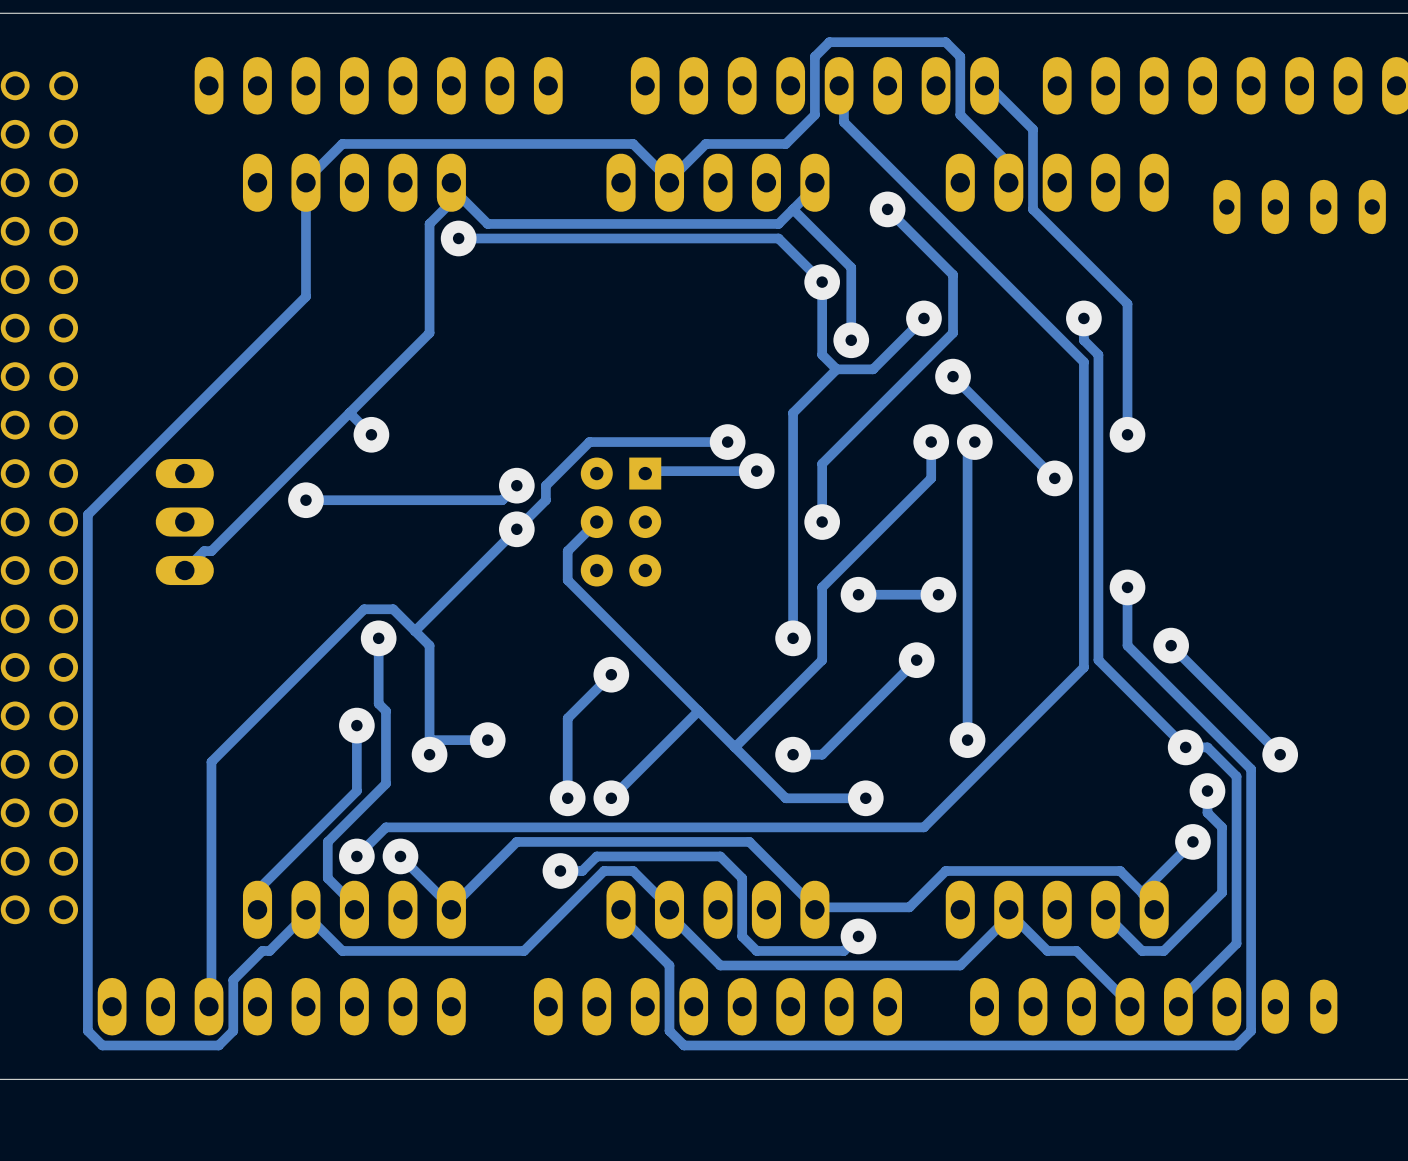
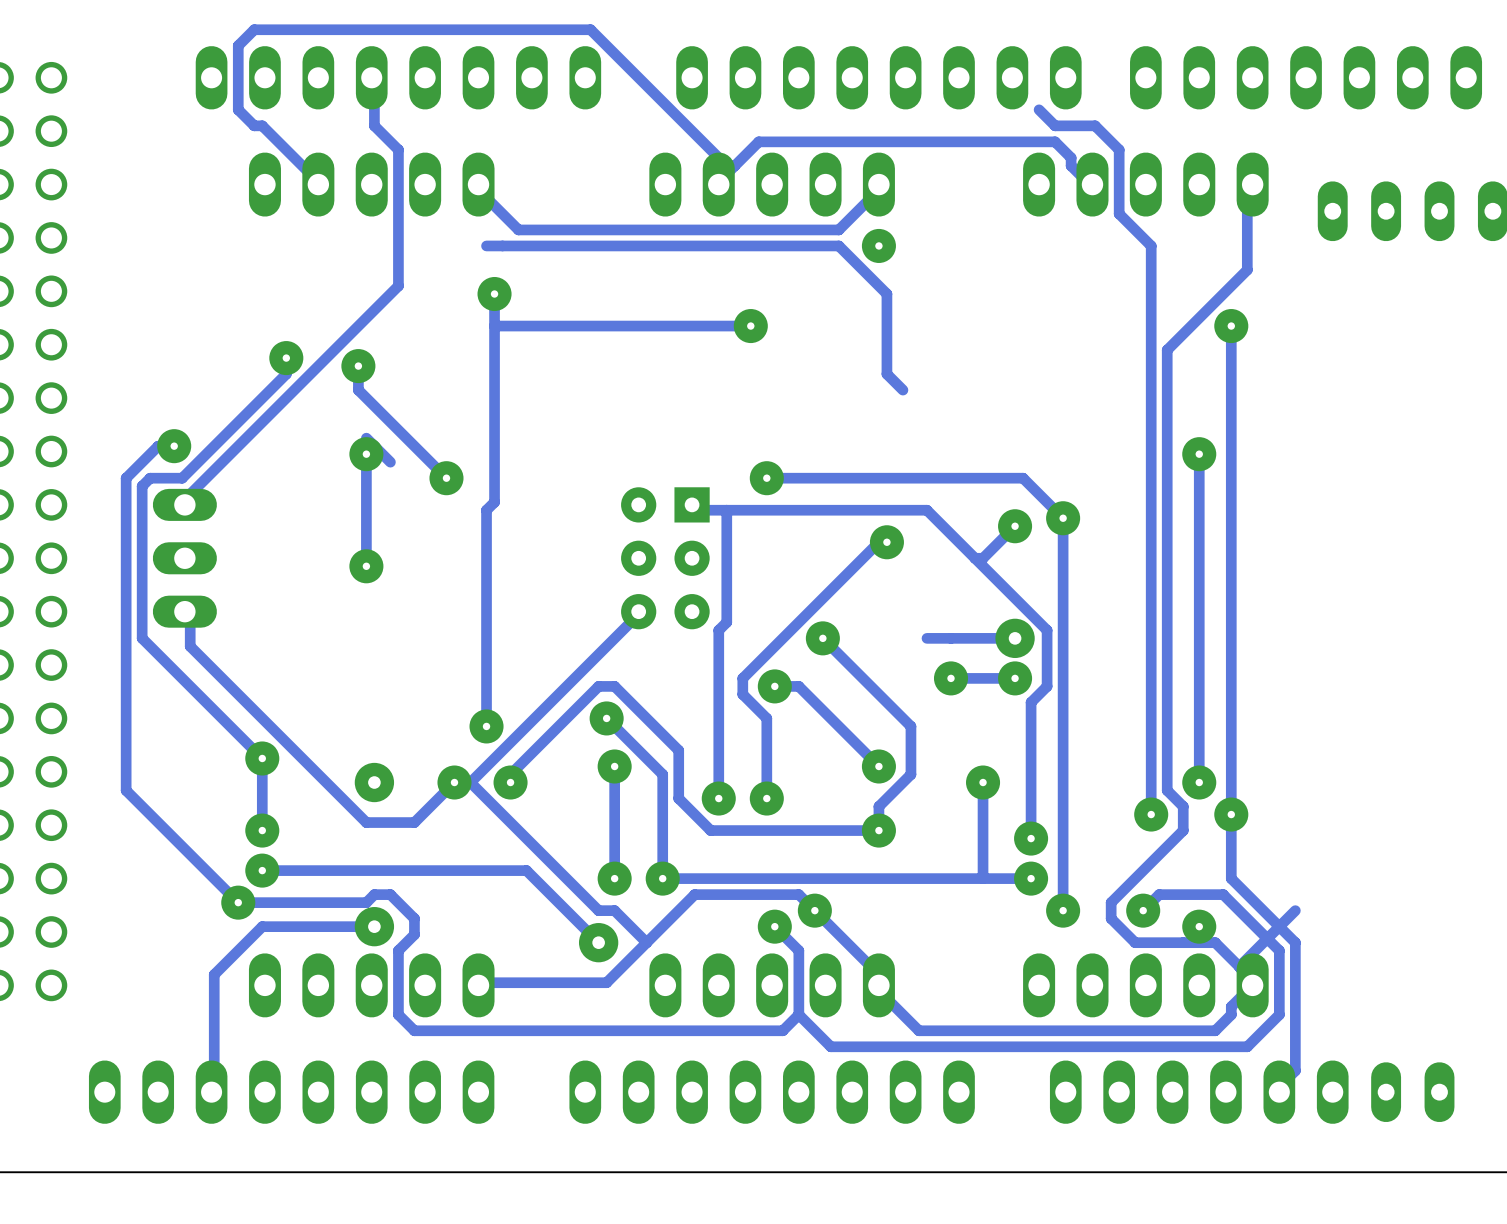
track: none -> (371, 77) (374, 77) (374, 125) (398, 149) (398, 286) (182, 502) (184, 504)
track: (839, 85) (843, 85) (843, 122) (1083, 362) (1083, 667) (923, 827) (742, 827) -> (878, 982) (878, 974) (798, 894)
track: (984, 85) (989, 85) (1033, 129) (1033, 151) -> none
track: (960, 114) (960, 56) (945, 42) (829, 42) (814, 56) (814, 114) (785, 143) -> (1087, 181) (1071, 165) (1071, 157) (1055, 141) (846, 141)
track: (974, 129) (1003, 158) (1003, 180) -> (1055, 125) (1095, 125) (1119, 149)
track: (669, 180) (633, 143) (342, 143) (305, 180) -> (734, 165) (726, 165) (590, 29) (254, 29) (238, 45) (238, 109) (254, 125) (262, 125) (318, 181)
track: (305, 182) (305, 296) (153, 449) -> (286, 358) (286, 374) (182, 478) (150, 478)
track: (451, 182) (458, 194) (429, 223) (429, 333) (211, 551) (204, 551) (184, 570) -> (470, 782) (454, 782) (414, 822) (366, 822) (190, 646) (190, 614) (184, 611)
track: (793, 209) (851, 267) (851, 340) -> none
track: (887, 209) (953, 274) (953, 333) (822, 463) (822, 522) -> none
via: (887, 209) -> none
via: (458, 238) -> none
via: none -> (878, 245)
track: (1062, 238) (1127, 303) (1127, 434) -> (1151, 245) (1151, 814)
track: none -> (494, 294) (494, 502) (486, 510) (486, 726)
via: none -> (494, 294)
via: (822, 282) -> none
track: none -> (750, 326) (494, 326)
via: none -> (750, 326)
via: none -> (1231, 326)
track: (923, 318) (873, 369) (836, 369) (793, 412) (793, 638) -> none
via: (923, 318) -> none
track: (1083, 318) (1083, 340) (1098, 354) (1098, 660) (1185, 747) (1207, 747) (1236, 776) (1236, 943) (1192, 987) -> (1231, 326) (1231, 878) (1295, 942) (1295, 1070)
via: (1083, 318) -> none
via: none -> (286, 358)
via: (851, 340) -> none
track: none -> (358, 366) (358, 390) (446, 478)
via: none -> (358, 366)
track: (953, 376) (1054, 478) -> none
via: (953, 376) -> none
via: none -> (174, 446)
track: none -> (366, 454) (366, 566)
via: none -> (366, 454)
track: none -> (1199, 454) (1199, 782)
via: none -> (1199, 454)
via: (371, 434) -> none
via: (1127, 434) -> none
track: (727, 442) (589, 442) (545, 485) (545, 500) (415, 631) -> none
via position: (727, 442) -> (766, 478)
track: (931, 442) (931, 478) (822, 587) (822, 660) (734, 747) -> none
via: (931, 442) -> none
track: (974, 442) (967, 449) (967, 587) -> none
via: (974, 442) -> none
via: none -> (446, 478)
track: none -> (766, 478) (1023, 478) (1063, 518) (1063, 910)
track: (146, 456) (87, 514) (87, 1030) (102, 1045) (218, 1045) (233, 1030) (233, 980) (262, 950) (269, 950) (305, 914) -> (142, 486) (142, 638) (262, 758) (262, 830)
track: (756, 471) (647, 471) (645, 473) -> (1047, 630) (926, 510) (694, 510) (692, 504)
via: (756, 471) -> none
track: none -> (726, 510) (726, 622) (718, 630) (718, 798)
via: (1054, 478) -> none
track: (516, 485) (502, 500) (305, 500) -> none
via: (516, 485) -> none
via: none -> (1063, 518)
track: none -> (1015, 526) (983, 558) (975, 558)
via: none -> (1015, 526)
via: (305, 500) -> none
track: none -> (886, 542) (878, 542) (742, 678) (742, 694) (766, 718) (766, 798)
track: (596, 522) (567, 551) (567, 580) (785, 798) (865, 798) -> none
via position: (822, 522) -> (886, 542)
via: none -> (366, 566)
via: (516, 529) -> none
track: none -> (638, 611) (638, 614) (470, 782)
track: (1127, 587) (1127, 645) (1251, 769) (1251, 1030) (1236, 1045) (684, 1045) (669, 1030) (669, 965) (618, 914) (621, 909) -> none
via: (1127, 587) -> none
track: none -> (822, 638) (910, 726) (910, 774) (878, 806) (878, 830) (710, 830) (678, 798) (678, 750) (614, 686) (598, 686) (510, 774) (510, 782)
via: none -> (822, 638)
via: (858, 594) -> none
via: none -> (951, 678)
via: none -> (1015, 678)
track: (378, 638) (378, 703) (385, 711) (385, 783) (327, 841) (327, 878) (356, 907) (354, 909) -> none
via: (378, 638) -> none
track: none -> (774, 686) (798, 686) (878, 766)
via: none -> (774, 686)
via: (793, 638) -> none
track: (967, 638) (967, 740) -> (1047, 686) (1031, 702) (1031, 838)
track: (1171, 645) (1280, 754) -> none
via: (1171, 645) -> none
track: (916, 660) (822, 754) (793, 754) -> none
via: (916, 660) -> none
track: none -> (606, 718) (662, 774) (662, 878) (1031, 878)
via: none -> (606, 718)
via: none -> (486, 726)
track: (611, 674) (567, 718) (567, 798) -> none
via: (611, 674) -> none
via: none -> (262, 758)
track: none -> (614, 766) (614, 878)
via: none -> (614, 766)
track: (698, 711) (611, 798) -> none
via: none -> (878, 766)
via: none -> (454, 782)
track: none -> (983, 782) (983, 878)
via: none -> (983, 782)
via: none -> (1199, 782)
track: (356, 732) (356, 791) (262, 885) (262, 907) (257, 909) -> none
track: (487, 740) (429, 740) -> (1015, 678) (951, 678)
via position: (487, 740) -> (510, 782)
via: none -> (718, 798)
via: none -> (766, 798)
via: (967, 740) -> none
via: (1185, 747) -> none
track: (429, 754) (429, 645) (393, 609) (364, 609) (211, 761) (211, 900) -> (382, 926) (262, 926) (214, 974)
via: (429, 754) -> none
via: (793, 754) -> none
via: none -> (1151, 814)
via: none -> (1231, 814)
via: (1280, 754) -> none
via: none -> (262, 830)
via: none -> (878, 830)
via: none -> (1031, 838)
track: (1207, 791) (1207, 812) (1222, 827) (1222, 892) (1178, 936) -> (1143, 910) (1159, 894) (1223, 894) (1279, 950) (1279, 1014)
via: (1207, 791) -> none
via position: (567, 798) -> (614, 878)
via position: (611, 798) -> (662, 878)
via: (865, 798) -> none
via: none -> (262, 870)
via: none -> (1031, 878)
track: (647, 827) (385, 827) (356, 856) -> (694, 894) (646, 942) (614, 910)
via: none -> (238, 902)
track: (560, 841) (516, 841) (451, 907) (400, 856) -> (598, 910) (470, 782)
track: (574, 841) (749, 841) (814, 907) (909, 907) (945, 871) (1047, 871) -> (1252, 184) (1247, 189) (1247, 269) (1167, 350) (1167, 790) (1183, 806) (1183, 830) (1111, 902) (1111, 918) (1135, 942)
via: none -> (814, 910)
via: none -> (1063, 910)
via: none -> (1143, 910)
via: (1192, 841) -> none
via: (400, 856) -> none
track: (720, 856) (596, 856) (582, 871) (560, 871) -> (262, 870) (526, 870) (598, 942)
via: none -> (774, 926)
via: none -> (1199, 926)
track: (604, 871) (633, 871) (669, 907) (669, 914) (720, 965) (771, 965) -> none
track: (567, 907) (524, 950) -> (606, 982) (478, 982)
track: none -> (878, 985) (878, 990) (918, 1030) (1135, 1030)
track: (1105, 909) (1105, 914) (1142, 950) (1163, 950) -> none
track: (305, 914) (342, 950) (393, 950) -> (174, 446) (158, 446) (126, 478) (126, 790) (238, 902) (366, 902) (374, 894) (390, 894) (414, 918) (414, 934) (398, 950) (398, 1014) (414, 1030)
track: none -> (798, 1014) (782, 1030) (558, 1030)
track: (858, 936) (843, 950) (756, 950) -> (830, 1046) (814, 1030)
via: (858, 936) -> none
track: (1047, 950) (1011, 914) (960, 965) -> (1263, 1030) (1247, 1046) (1039, 1046)
track: (1076, 950) (1127, 1001) (1129, 1006) -> (1167, 1030) (1215, 1030) (1231, 1014) (1231, 1006) (1252, 985)

